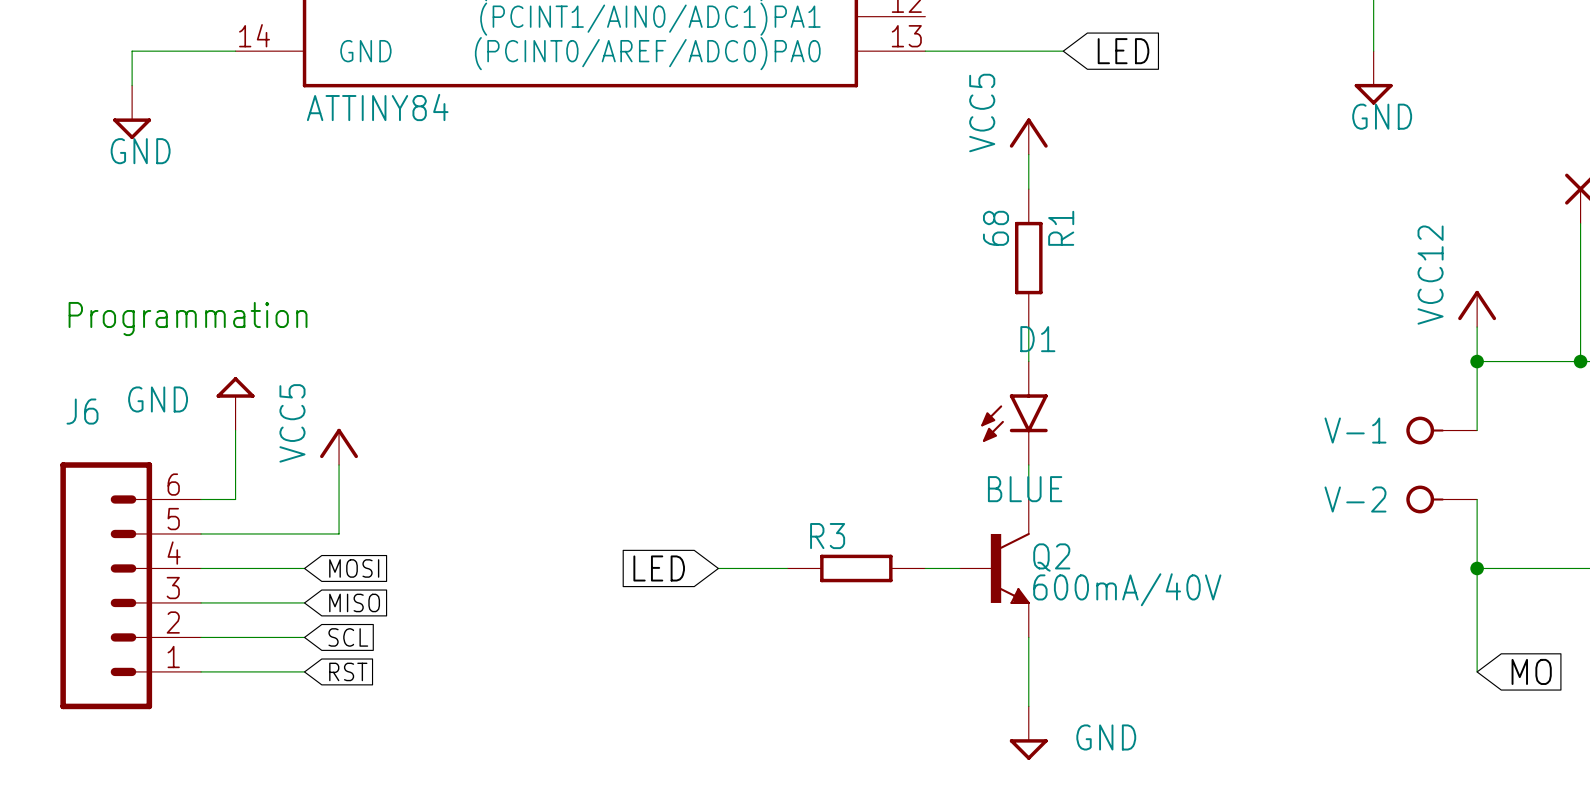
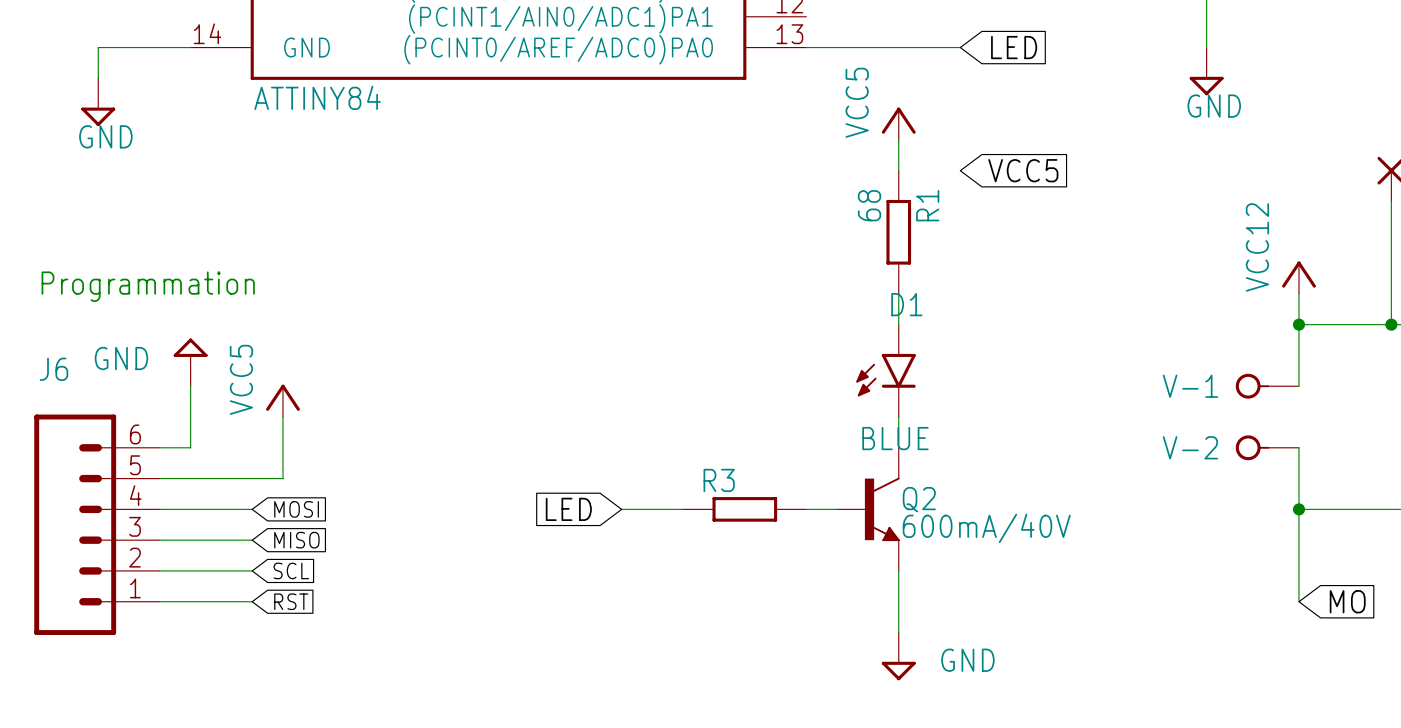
wire: none -> (929, 47) (960, 47)
global label position: LED (1123, 51) -> LED (1014, 47)
global label: none -> VCC5 (1023, 170)

